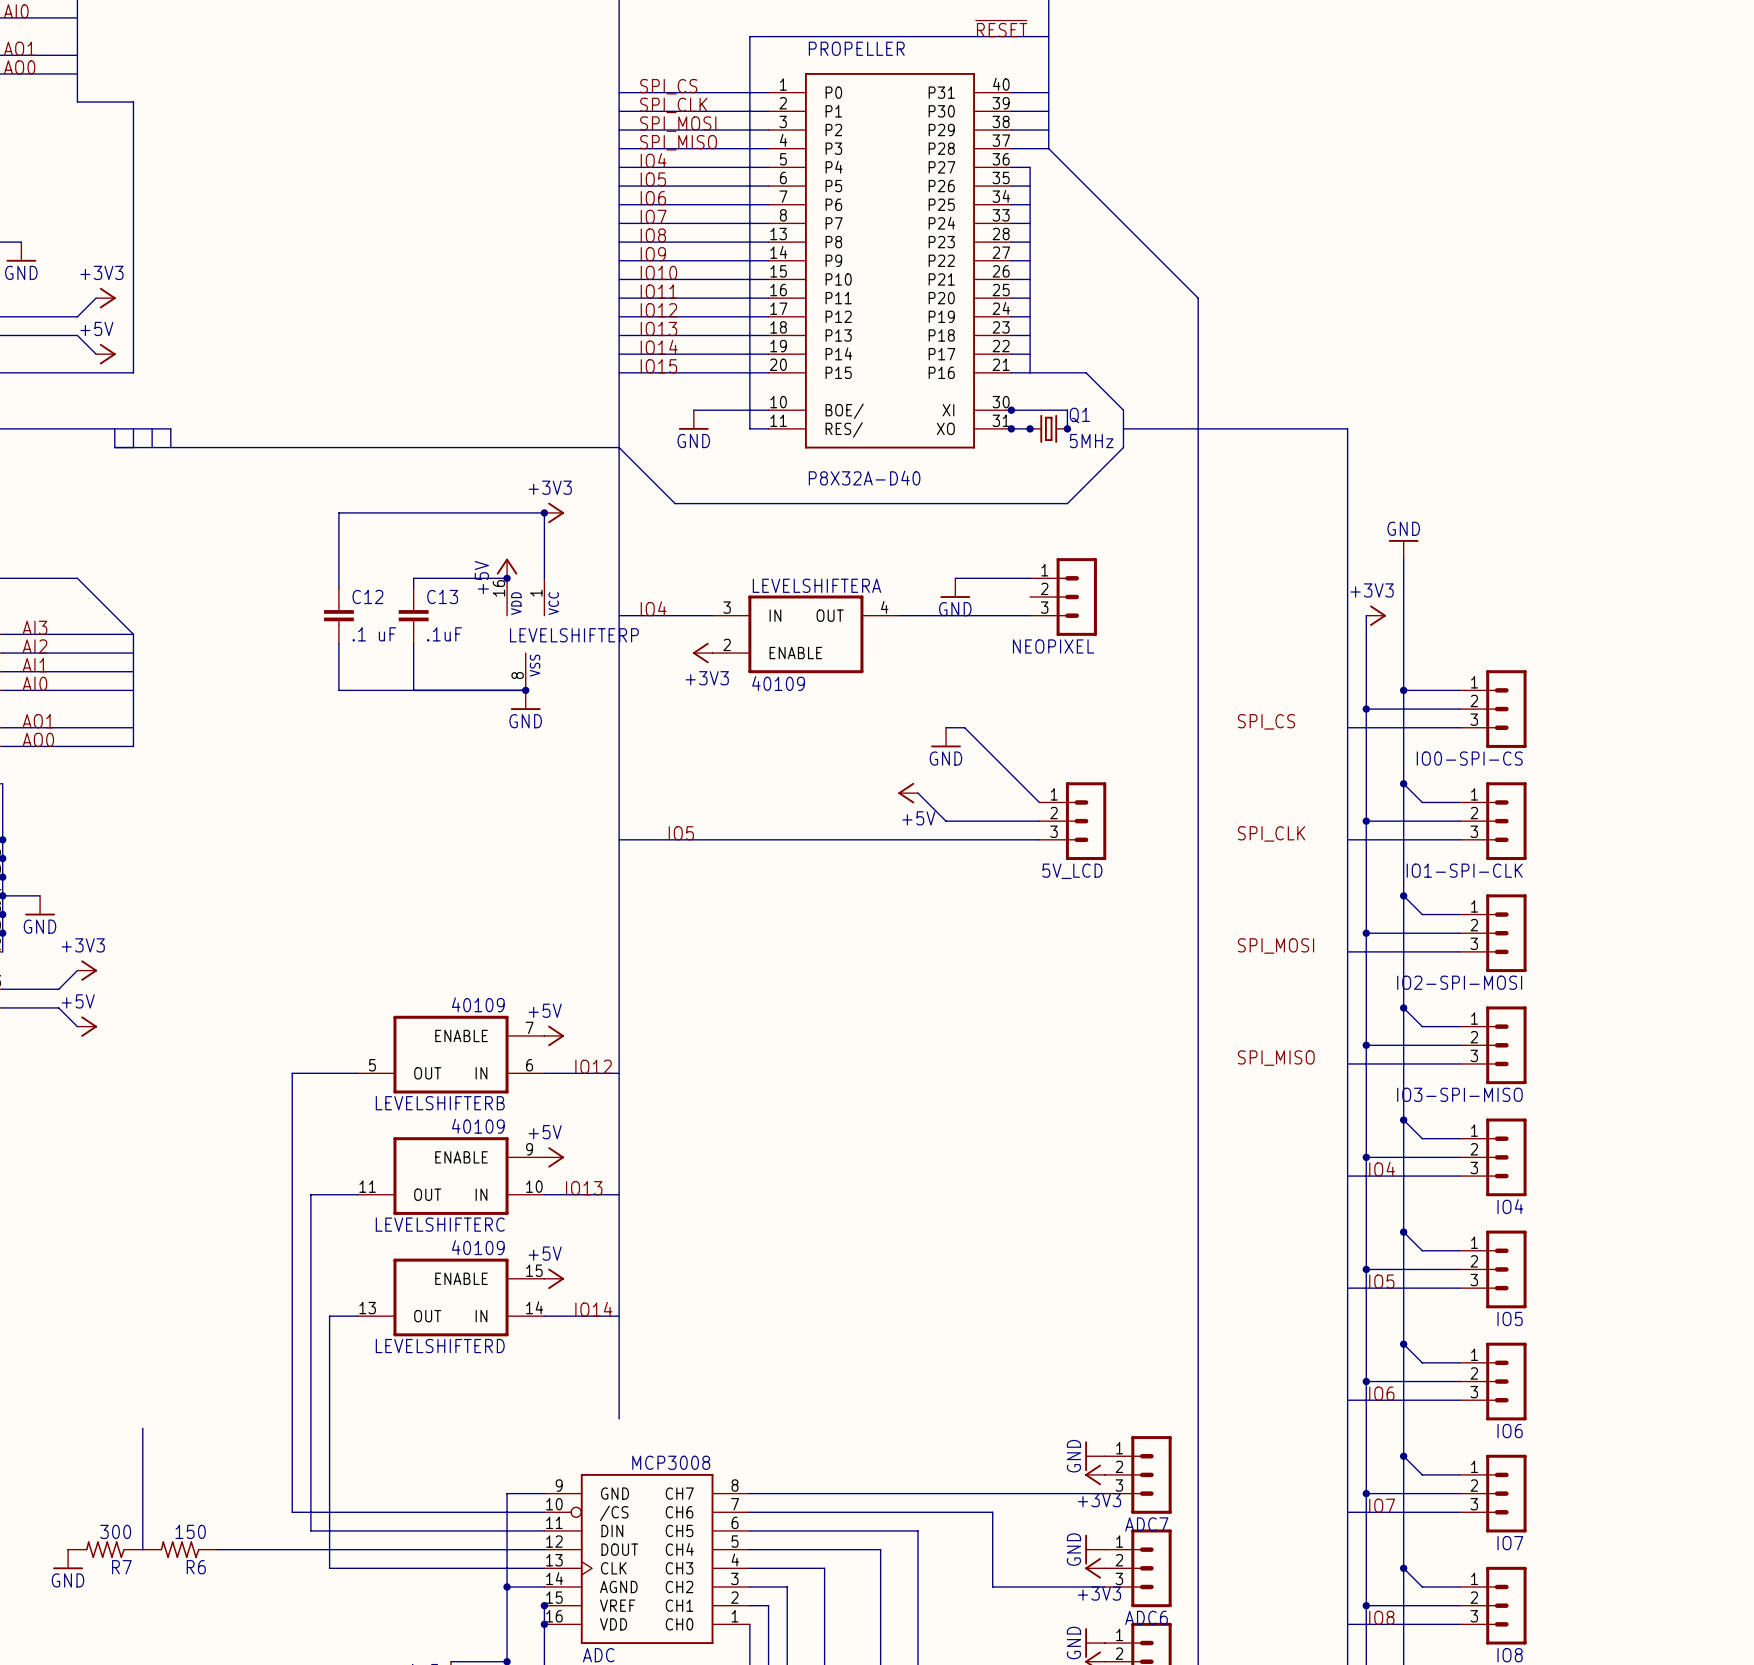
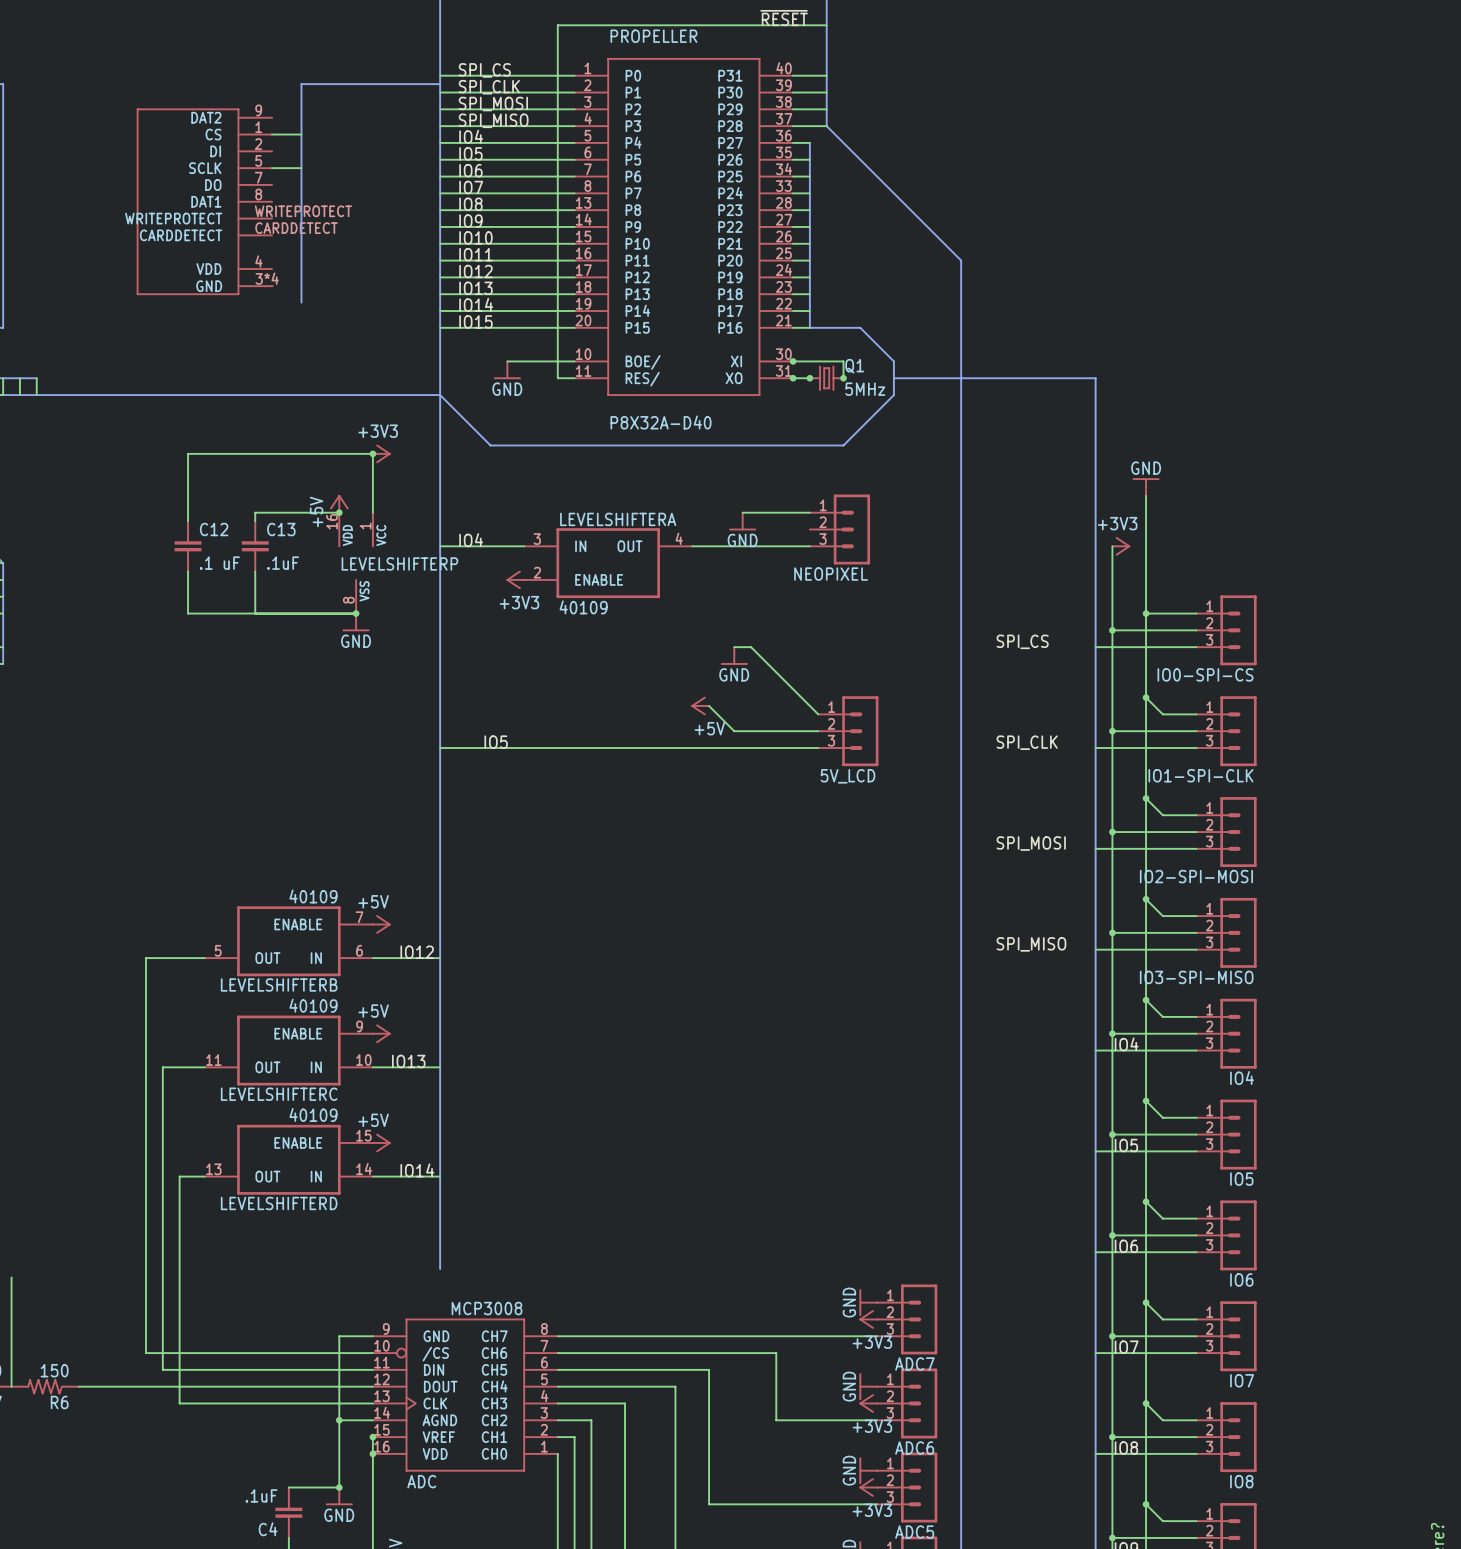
bus: none -> (440, 84) (301, 84) (301, 302)
wire: none -> (272, 134) (301, 134)
wire: none -> (272, 168) (301, 168)
part: none -> (204, 201)

